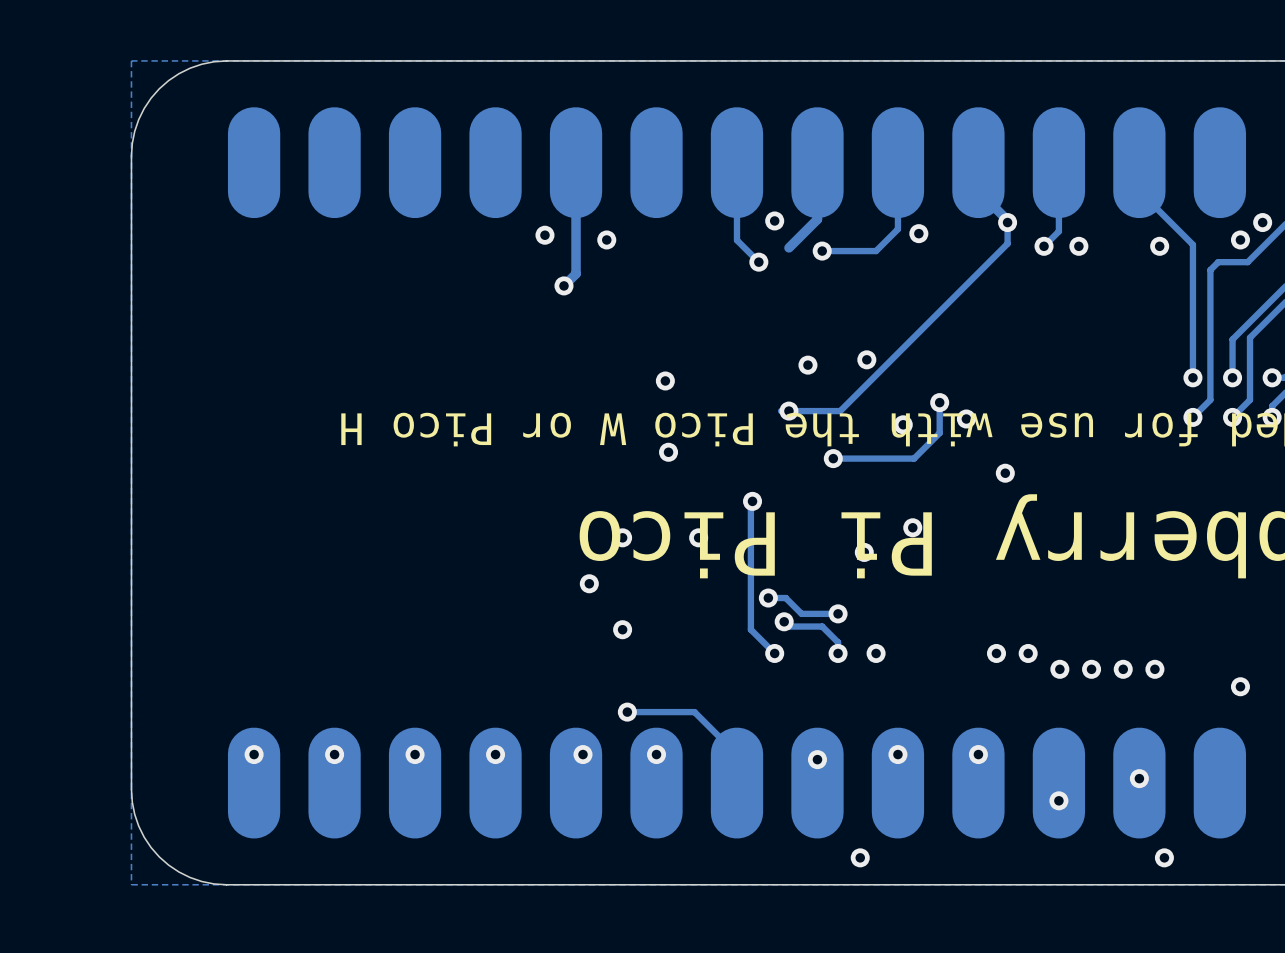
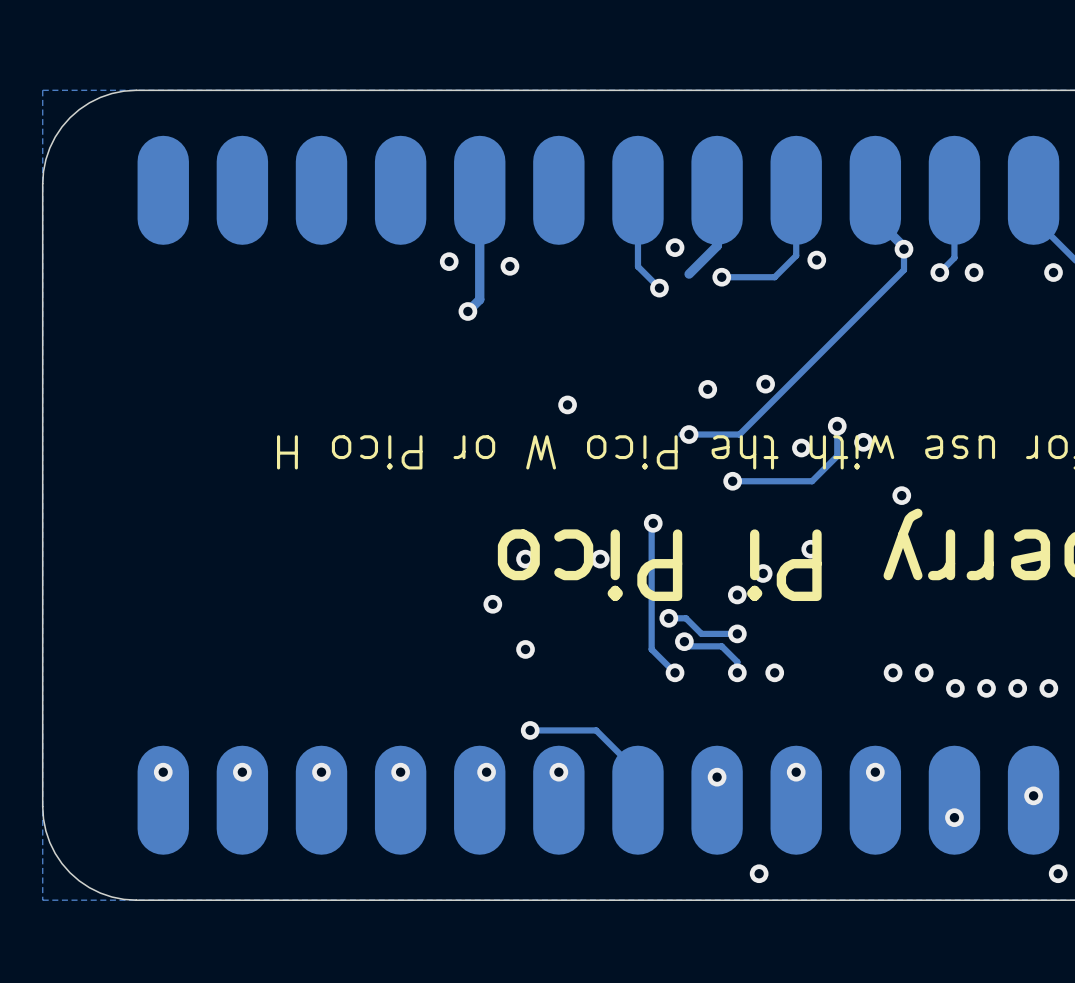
via: (668, 452) -> none
via: none -> (737, 594)

